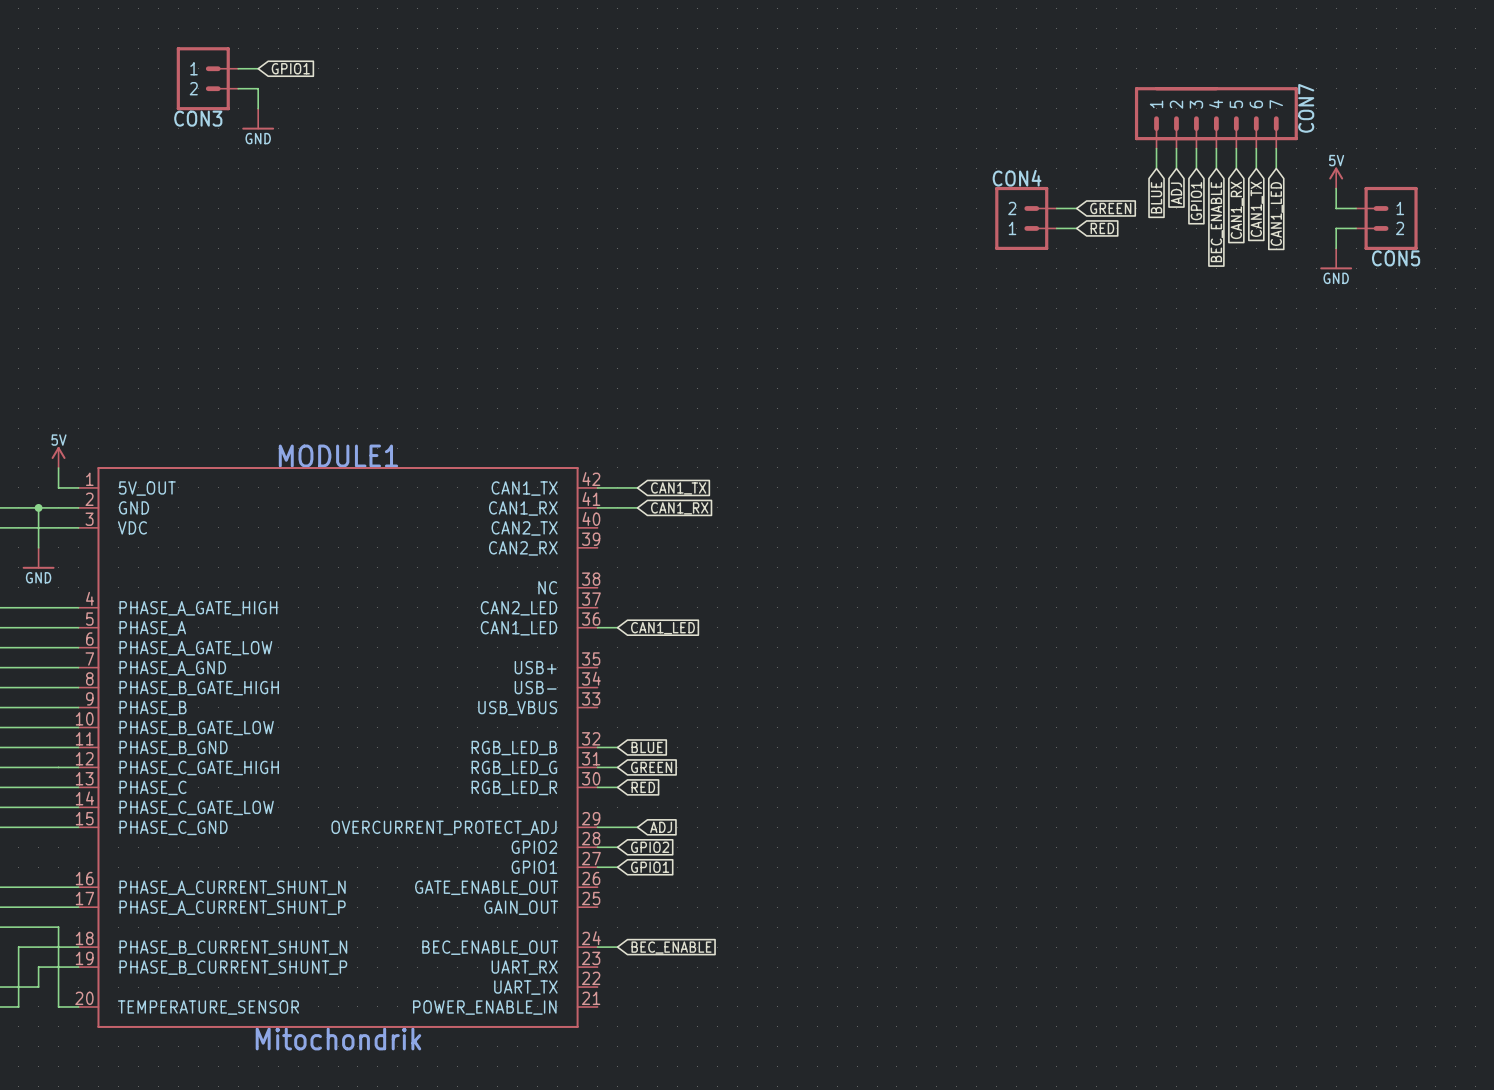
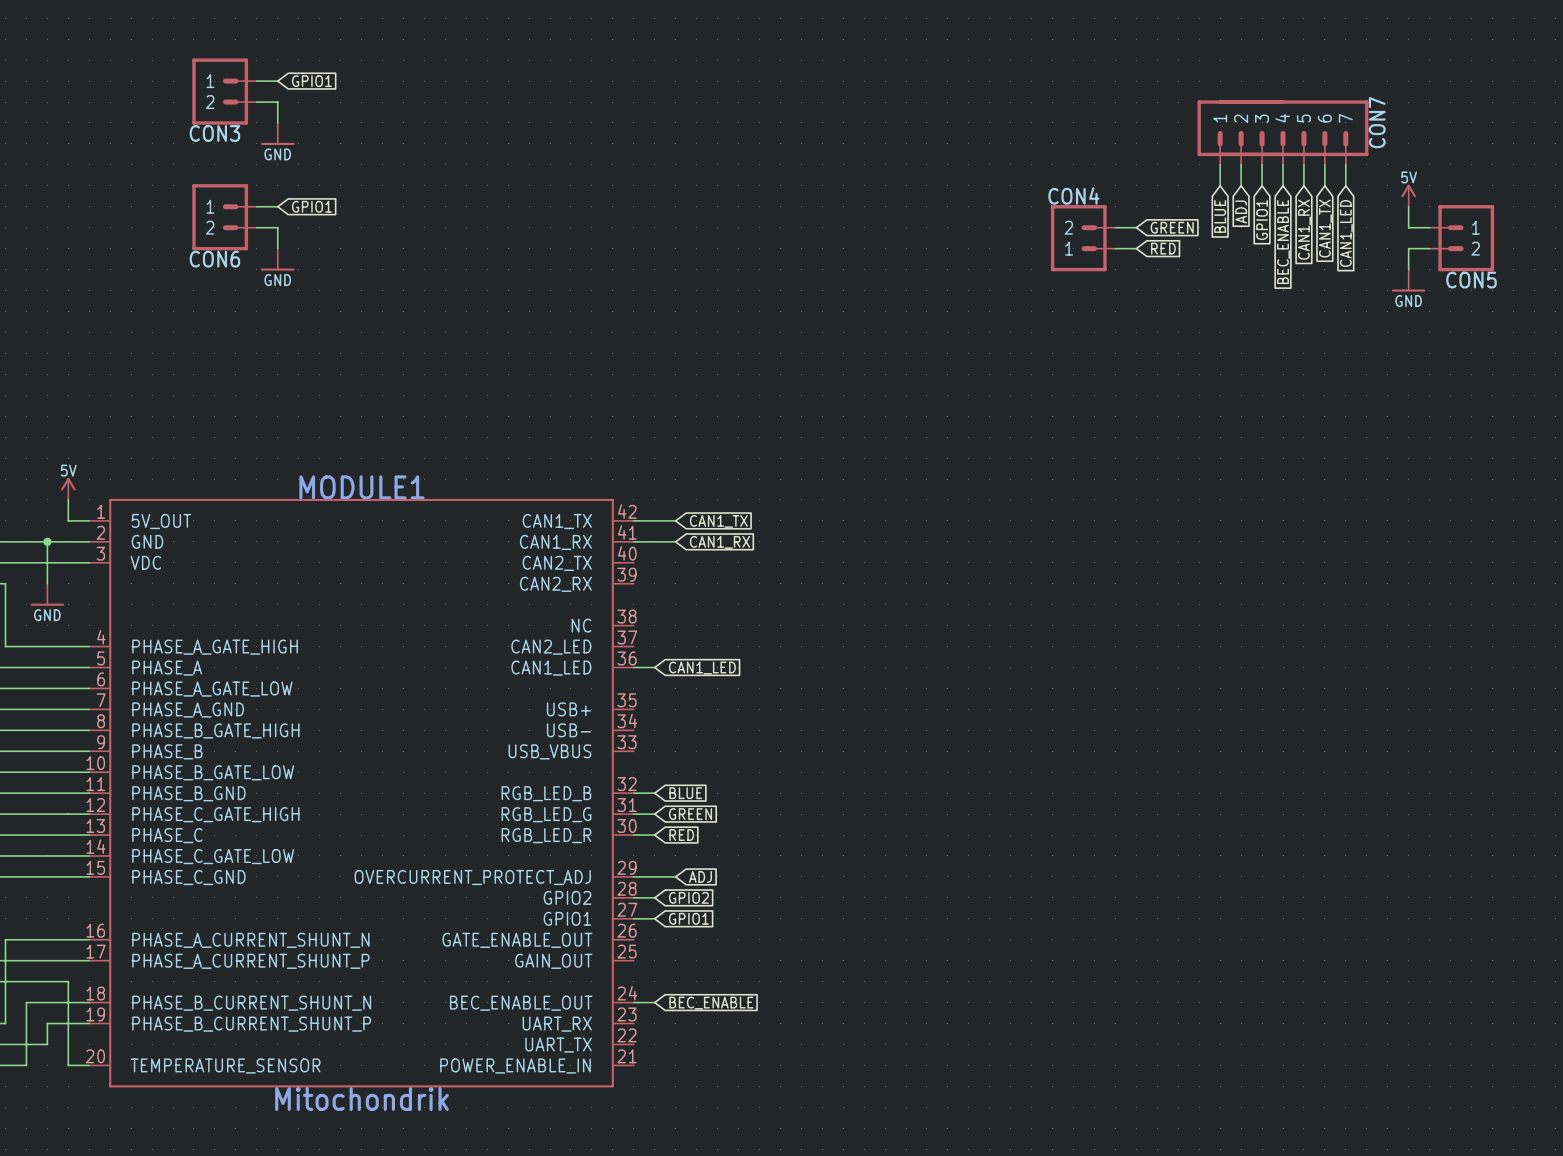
wire: none -> (256, 206) (277, 206)
global label: none -> GPIO1 (311, 206)
CON6: none -> (224, 217)
wire: none -> (256, 227) (277, 227) (277, 248)
power symbol: none -> GND (277, 259)

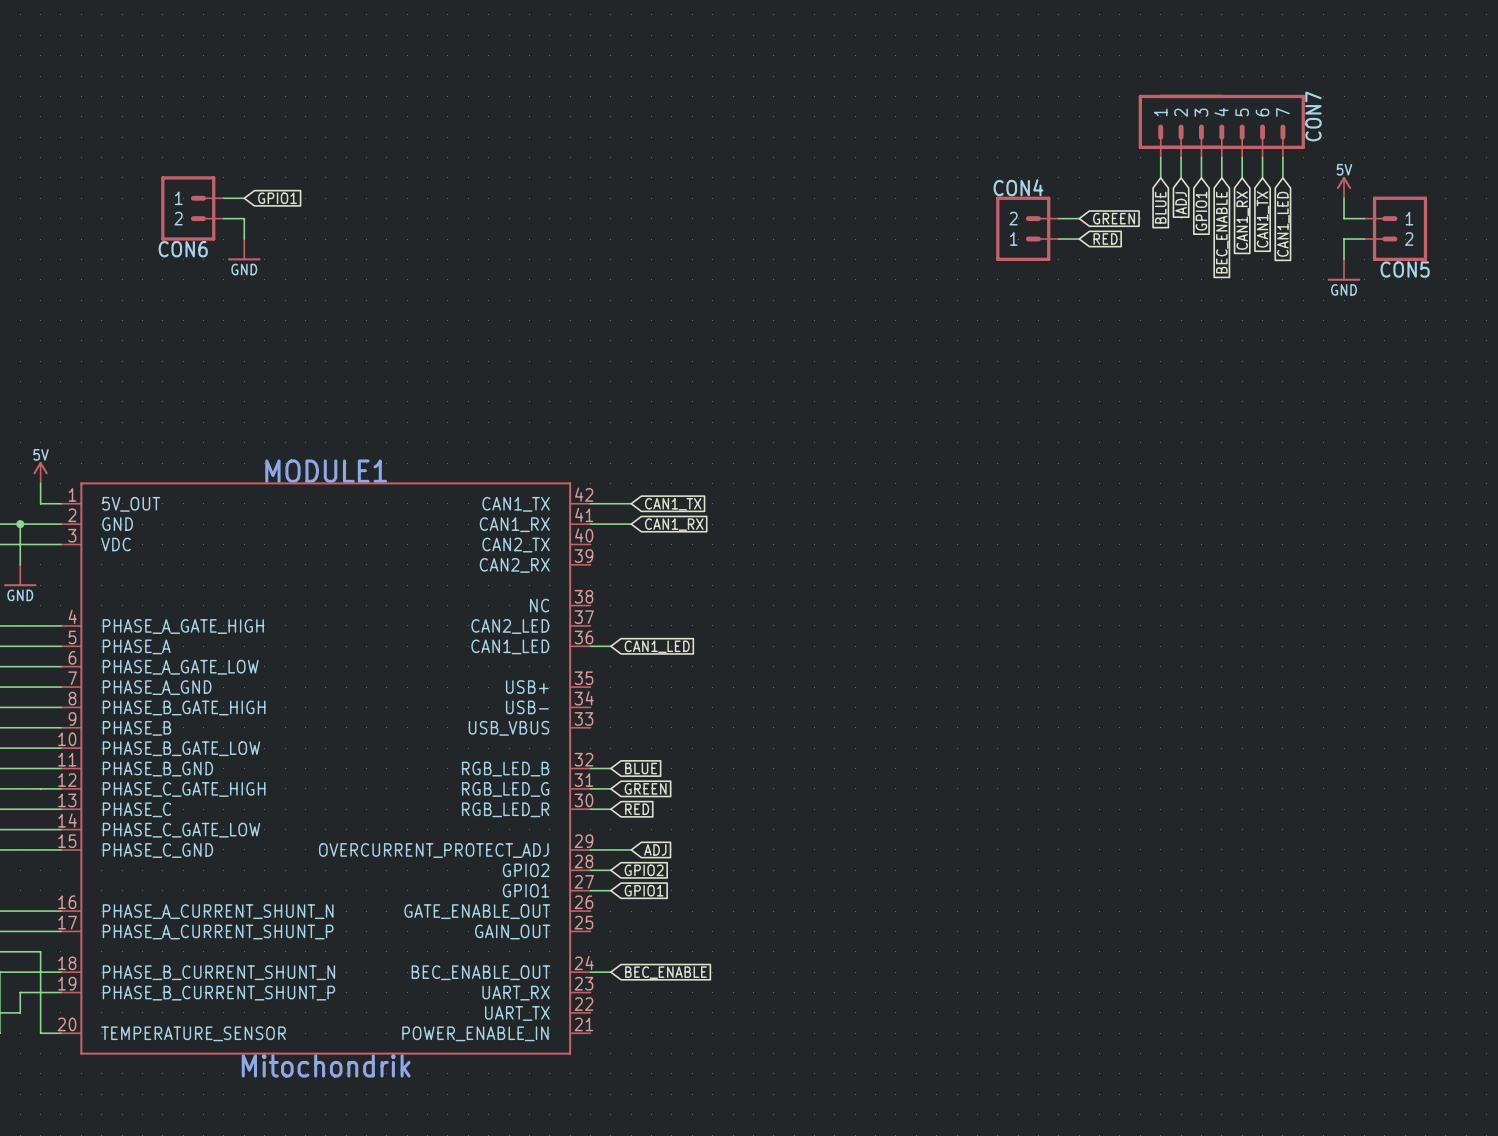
wire: (256, 81) (277, 81) -> none
global label: GPIO1 (311, 81) -> none
CON3: (224, 91) -> none
wire: (256, 102) (277, 102) (277, 122) -> none
power symbol: GND (277, 133) -> none

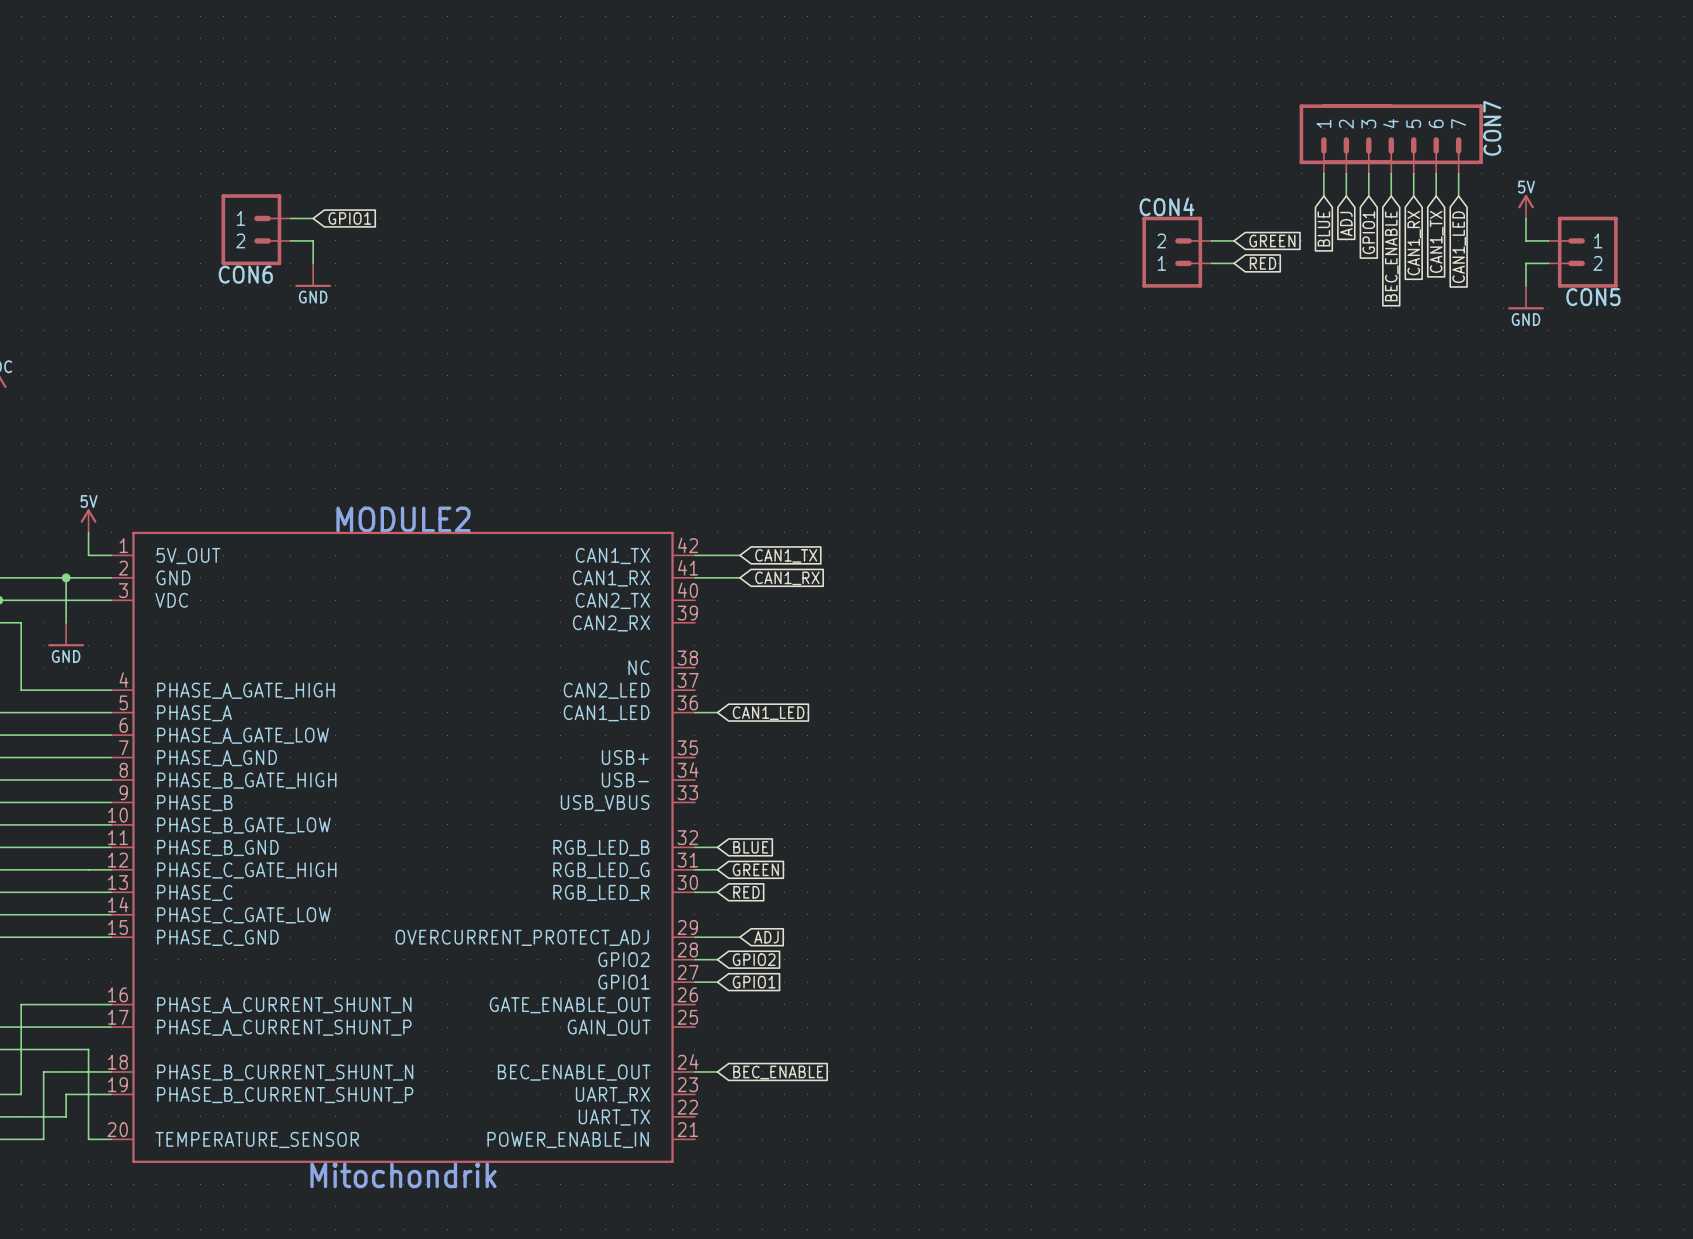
MODULE1 name: MODULE1 (326, 471) -> MODULE2 (403, 519)

